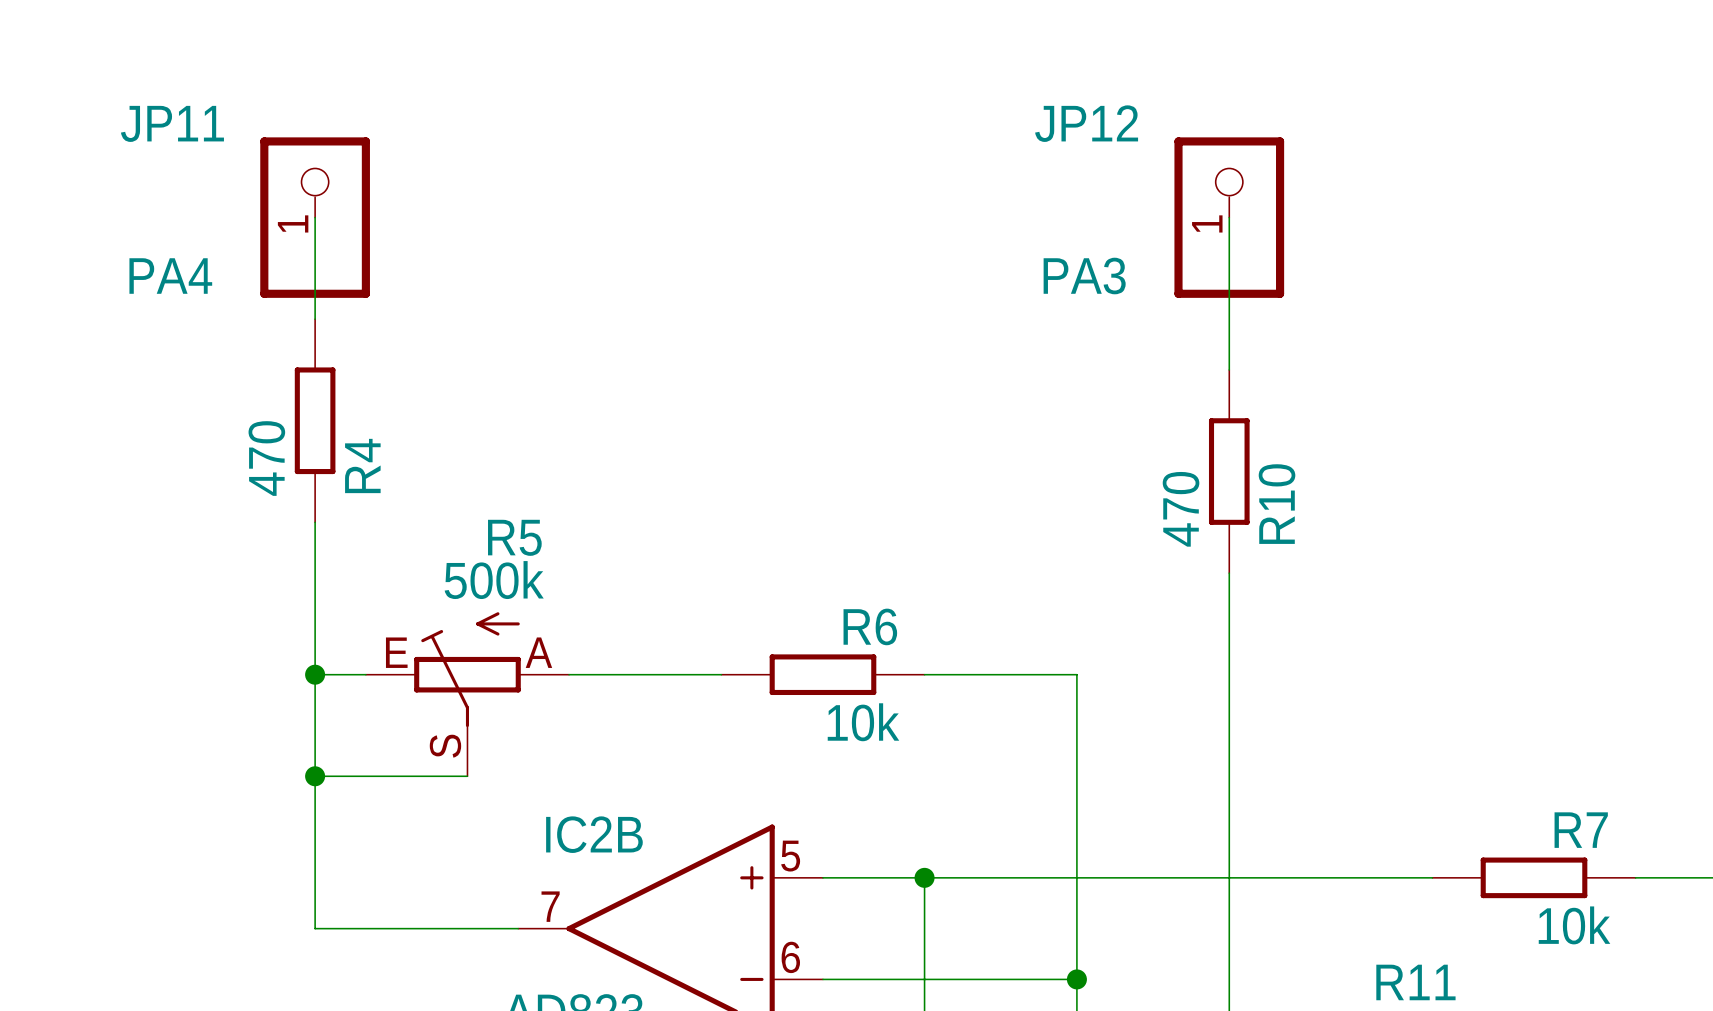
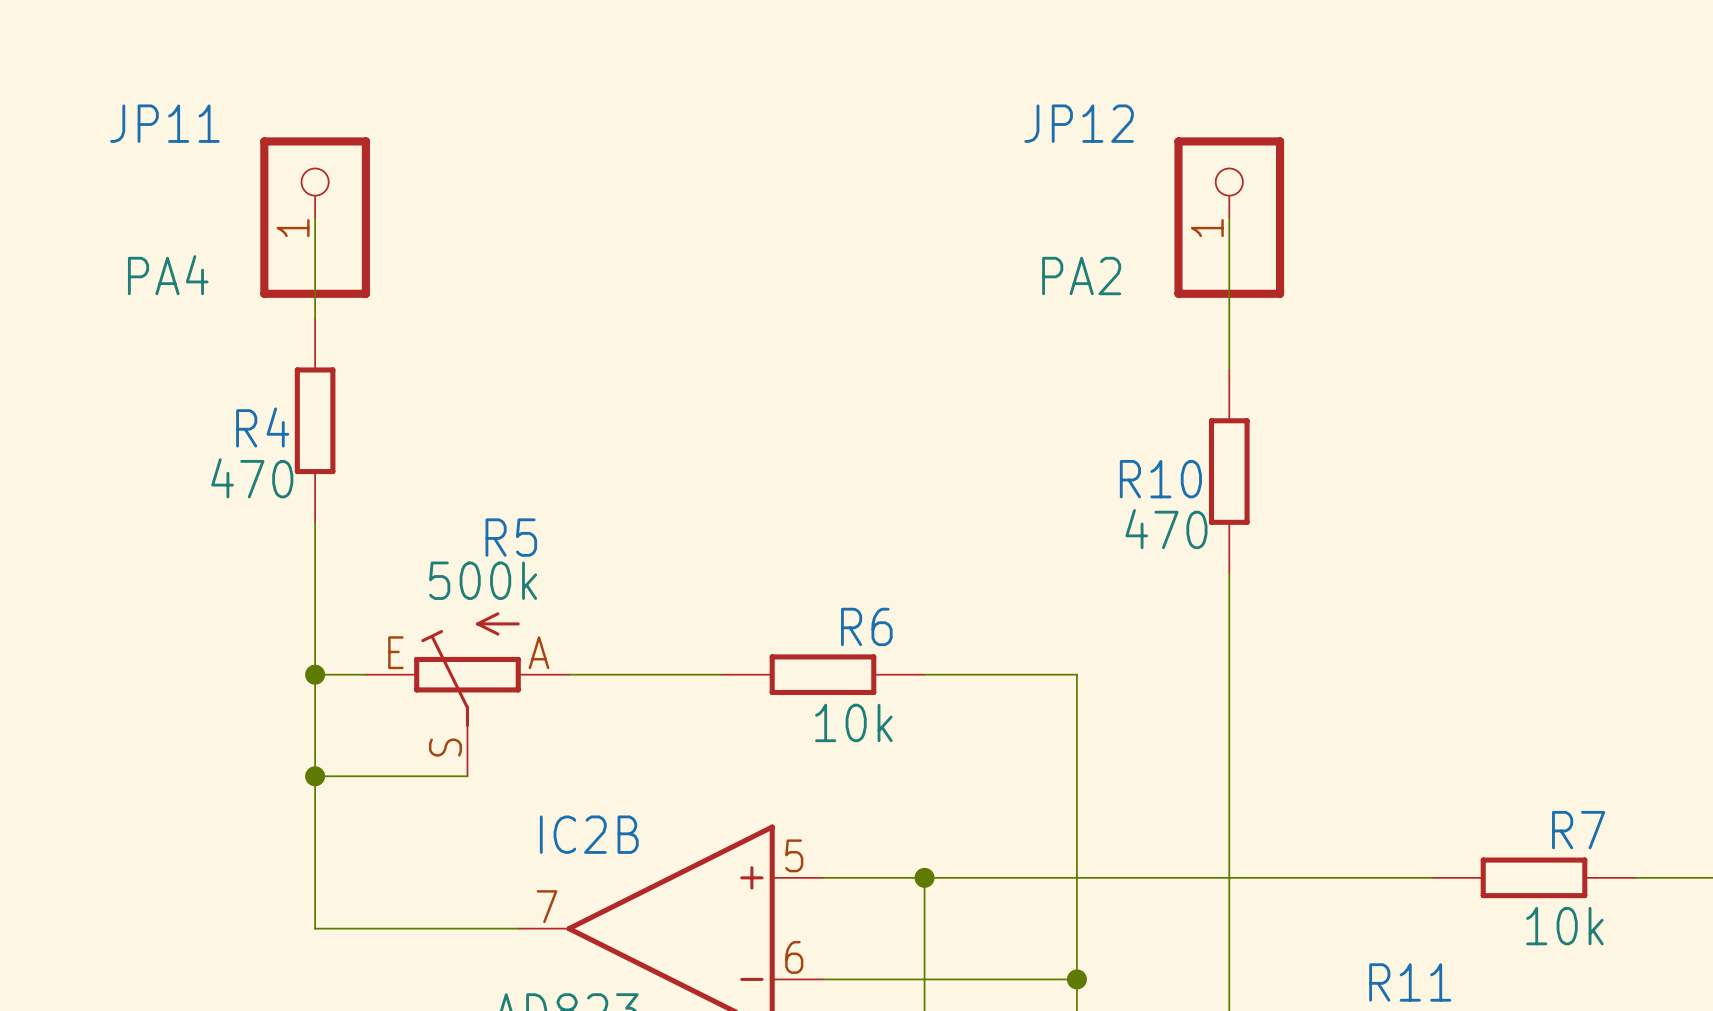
JP12 value: PA3 (1084, 276) -> PA2 (1081, 276)
R4 value rotation: 0° (266, 458) -> 90° clockwise (252, 478)
R4 name rotation: 0° (362, 465) -> 90° clockwise (262, 427)
R4 name position: R4 (362, 465) -> R4 (262, 427)
R10 name rotation: 0° (1277, 504) -> 90° clockwise (1160, 479)
R10 name position: R10 (1277, 504) -> R10 (1160, 479)
R10 value rotation: 0° (1181, 509) -> 90° clockwise (1166, 529)

